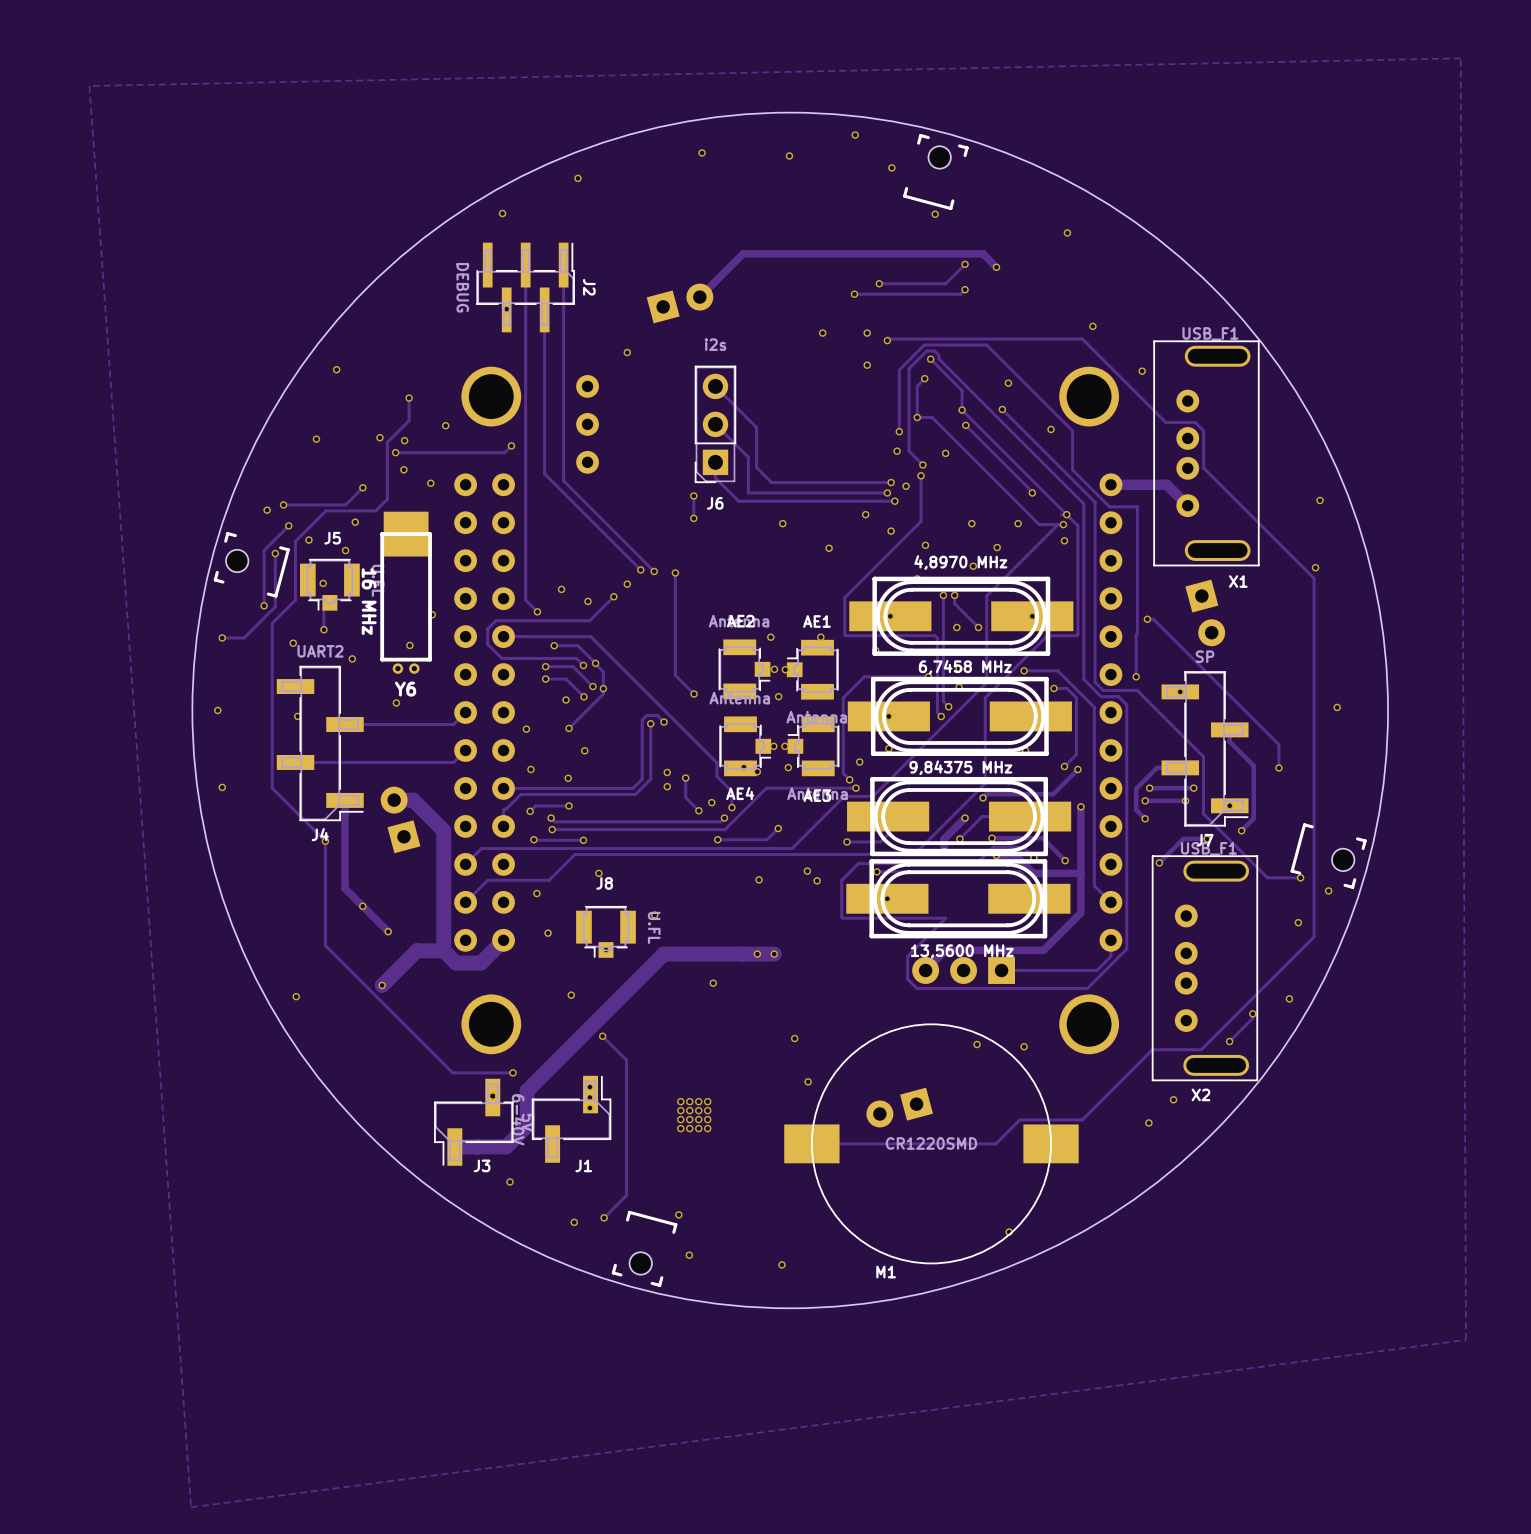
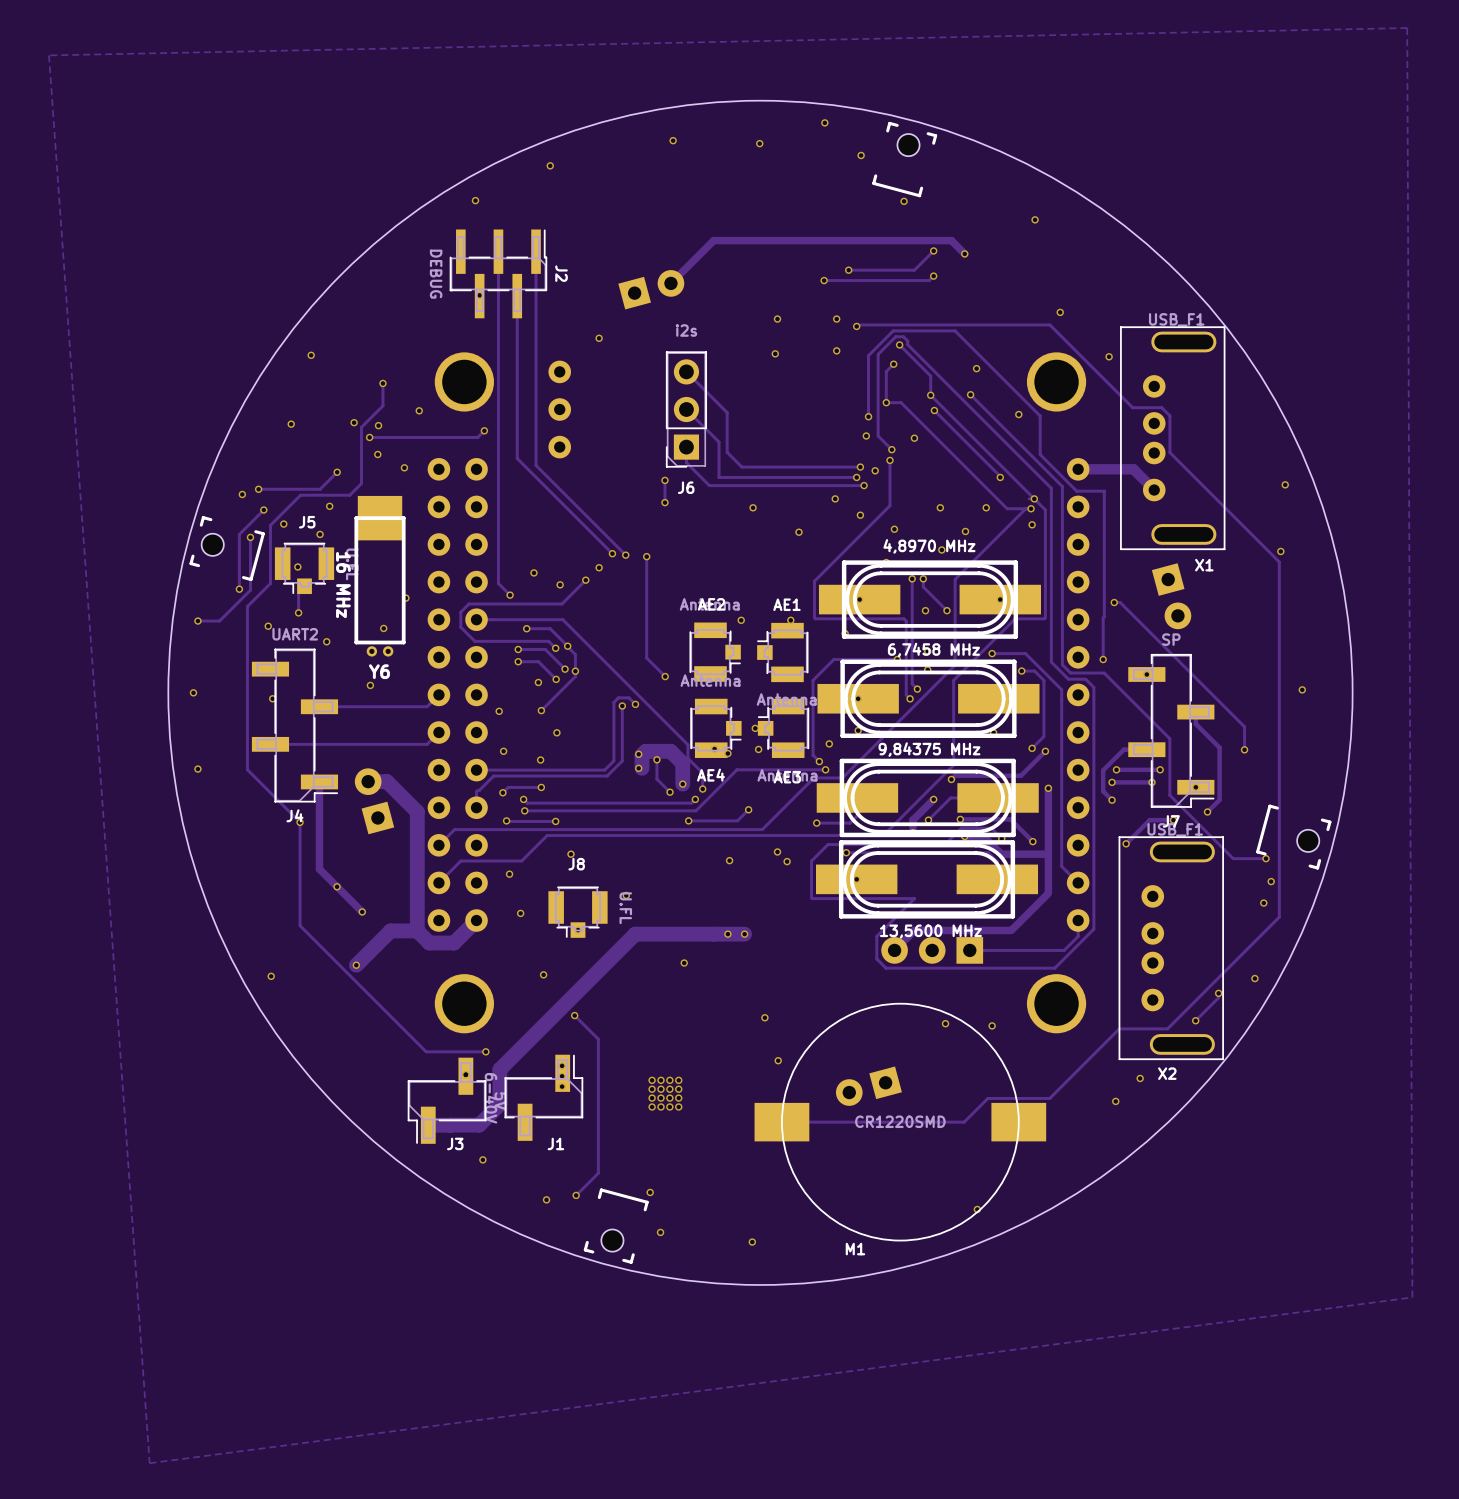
zone outline: (1460, 58) (89, 85) (191, 1507) (1465, 1339) (1460, 58) -> (1407, 28) (48, 55) (149, 1463) (1412, 1297) (1407, 28)
via position: (822, 333) -> (777, 319)
via: none -> (775, 353)
via: (774, 669) -> none
via: (785, 669) -> none
via: (778, 696) -> none
via: (773, 746) -> none
track: none -> (642, 768) (642, 755) (645, 751) (670, 751) (682, 763) (682, 784)
via position: (1328, 890) -> (1271, 881)

